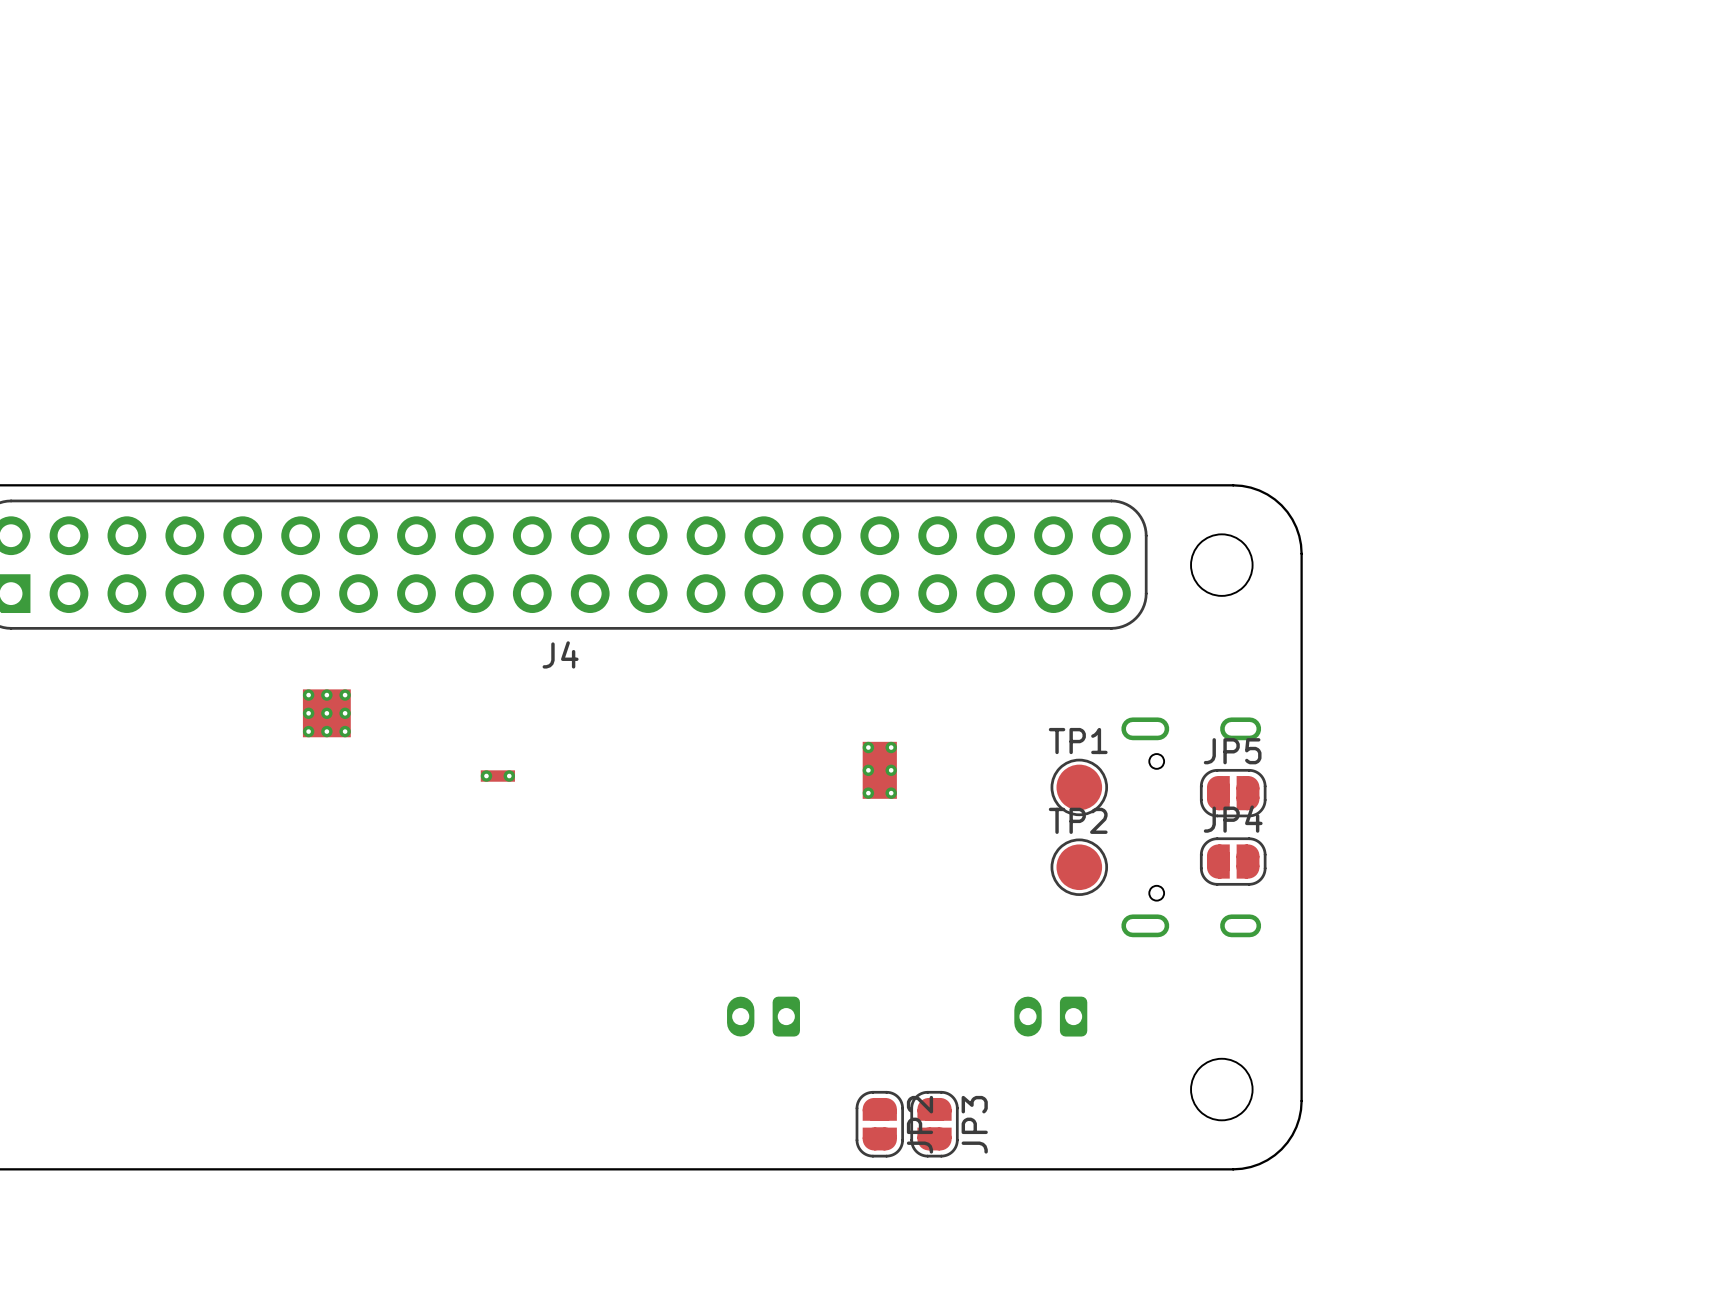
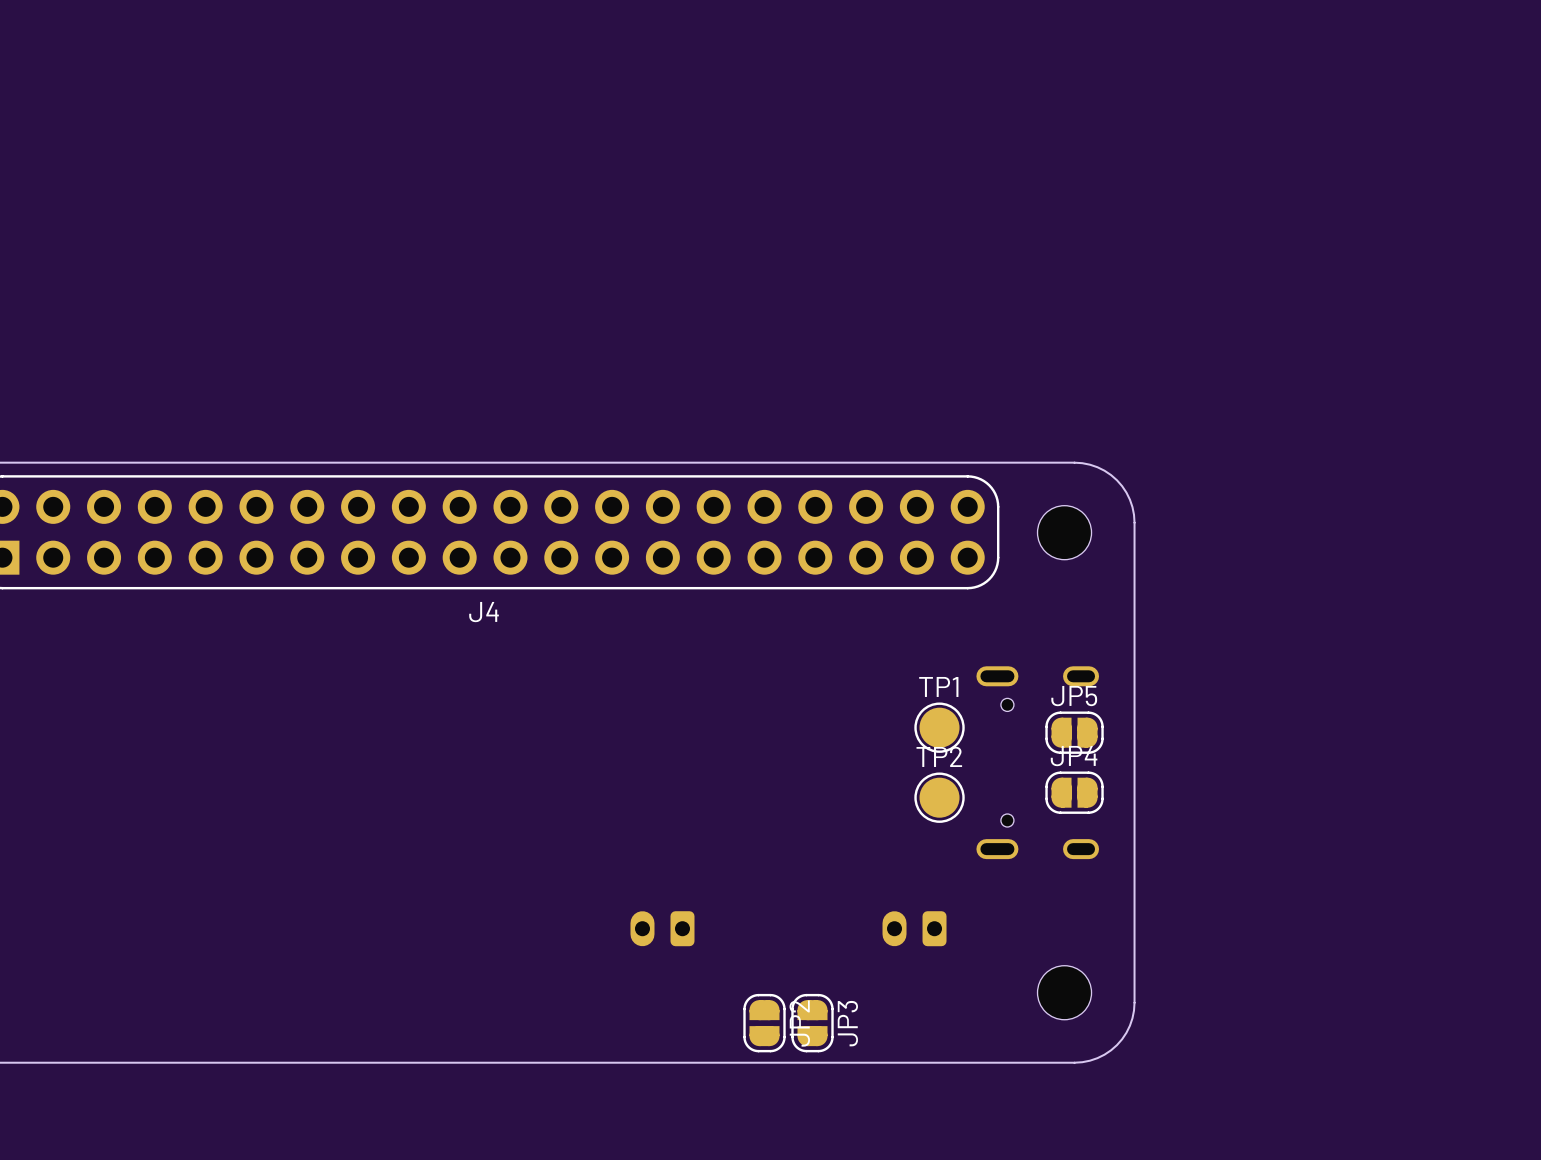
part: (326, 713) -> none
part: (879, 770) -> none
part: (497, 776) -> none

